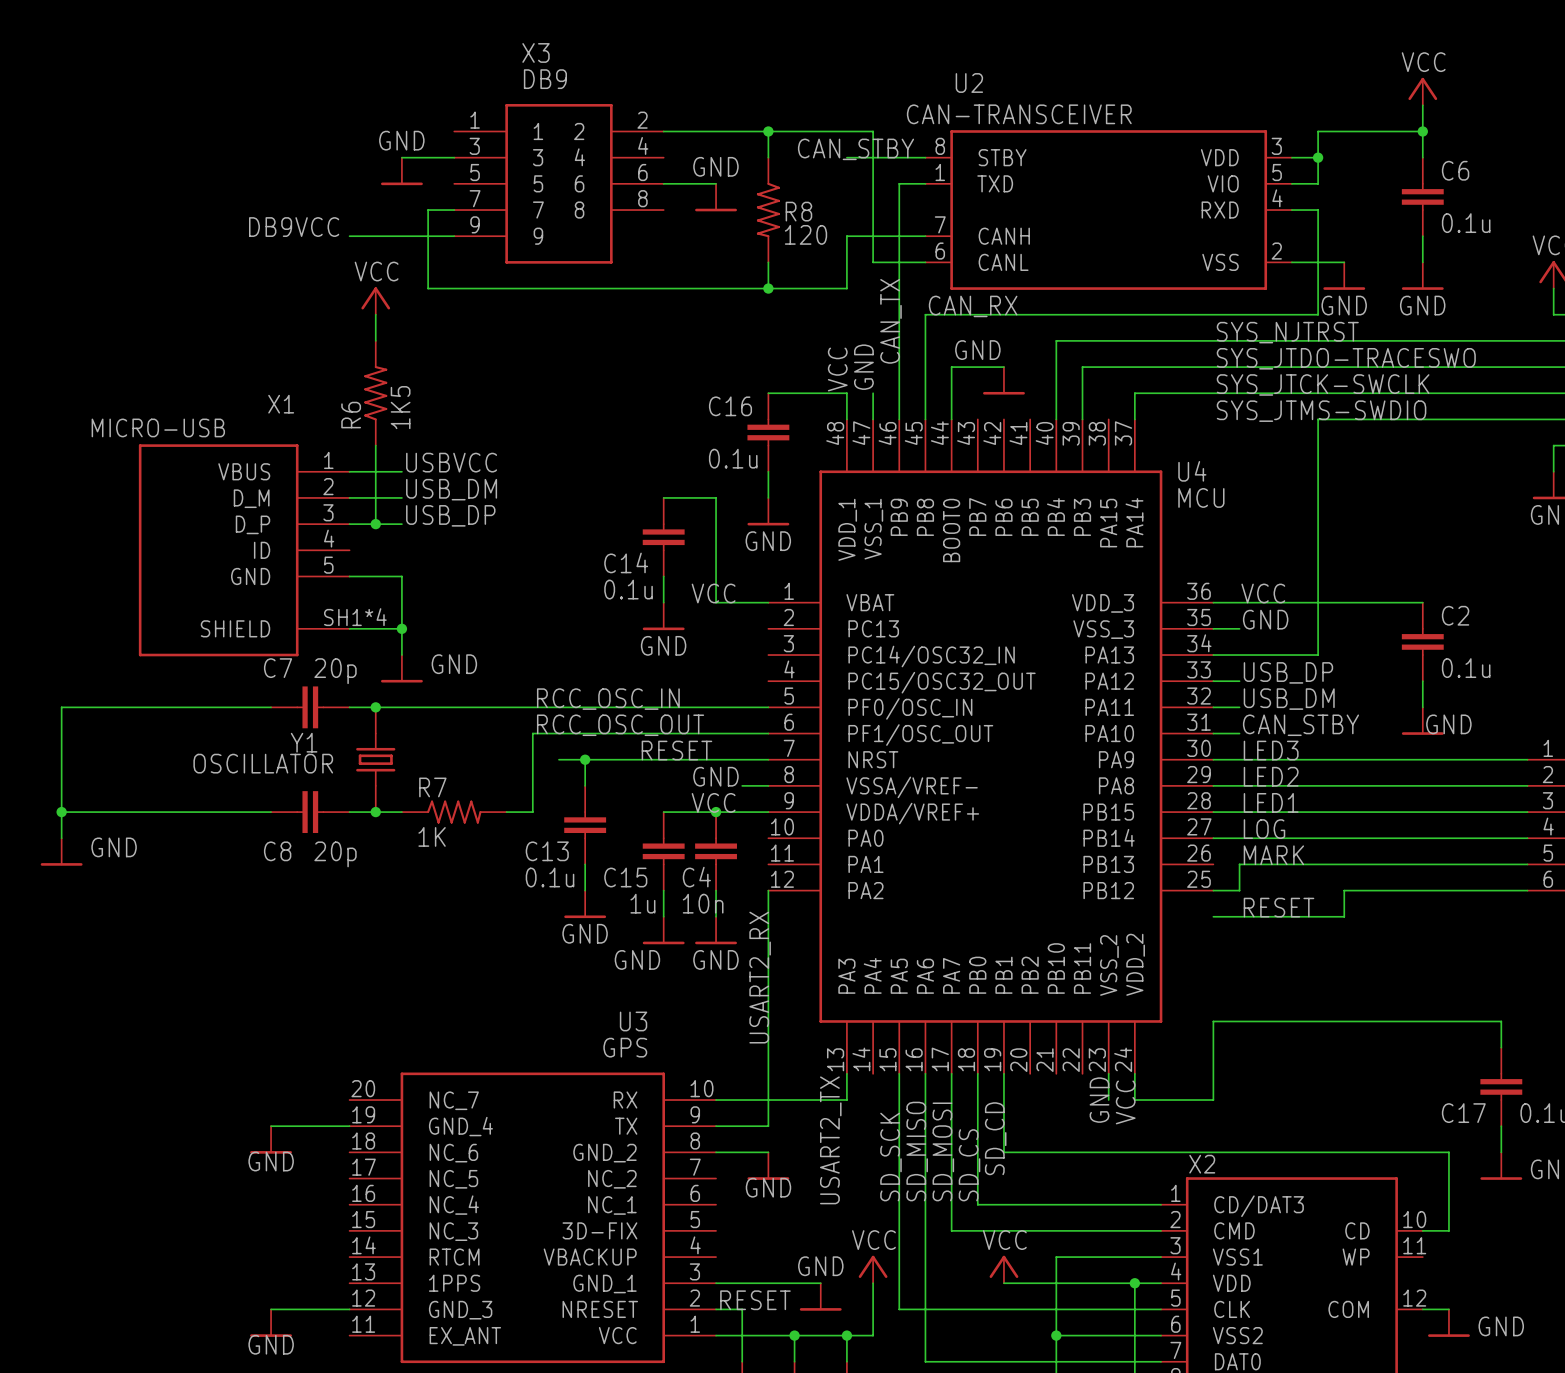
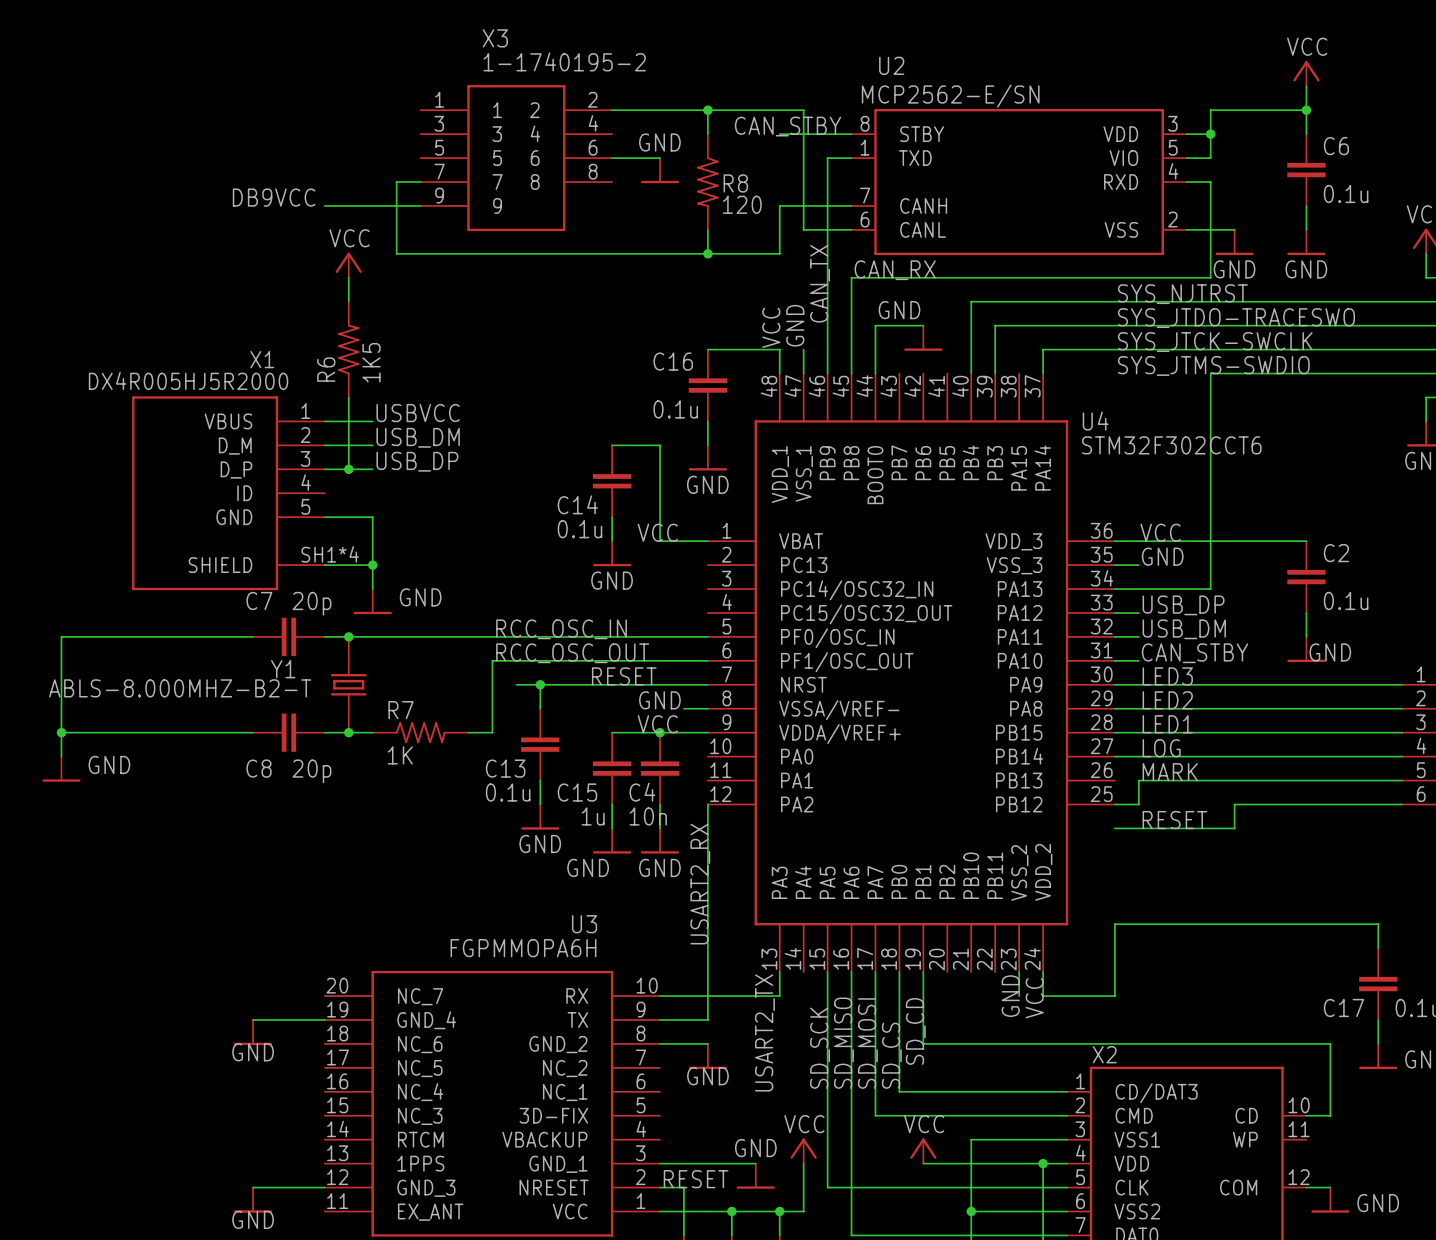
X3 value: DB9 (545, 79) -> 1-1740195-2 (564, 61)
U2 value: CAN-TRANSCEIVER (1019, 114) -> MCP2562-E/SN (950, 96)
wire: (401, 157) (454, 157) -> none
power symbol: GND (401, 171) -> none
X1 value: MICRO-USB (158, 427) -> DX4R005HJ5R2000 (188, 380)
U4 value: MCU (1201, 497) -> STM32F302CCT6 (1171, 445)
Y1 value: OSCILLATOR (263, 763) -> ABLS-8.000MHZ-B2-T (180, 688)
U3 value: GPS (625, 1047) -> FGPMMOPA6H (523, 948)

